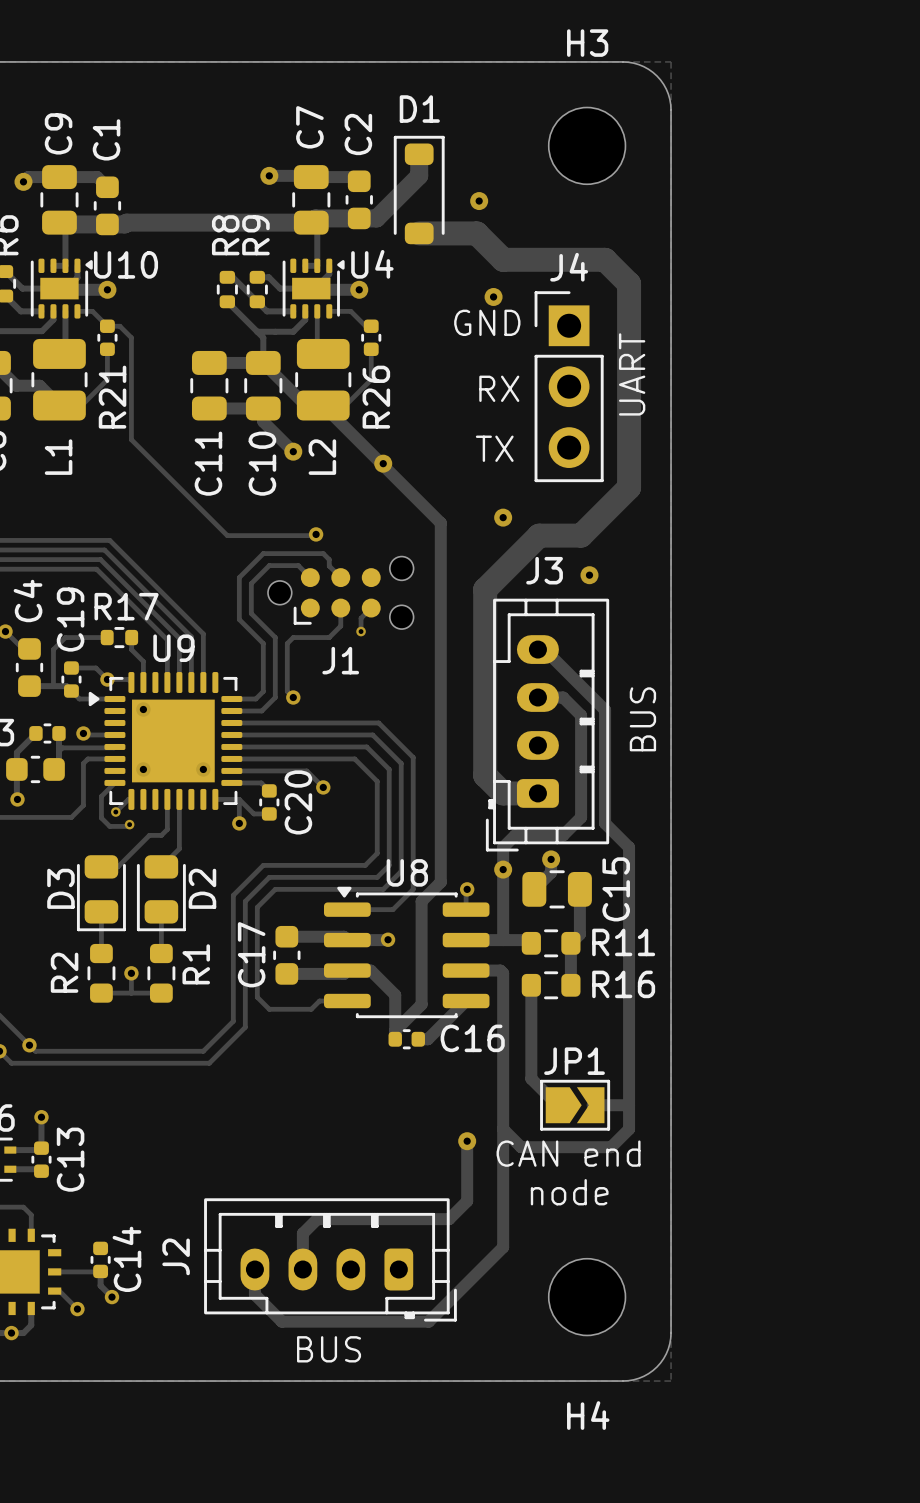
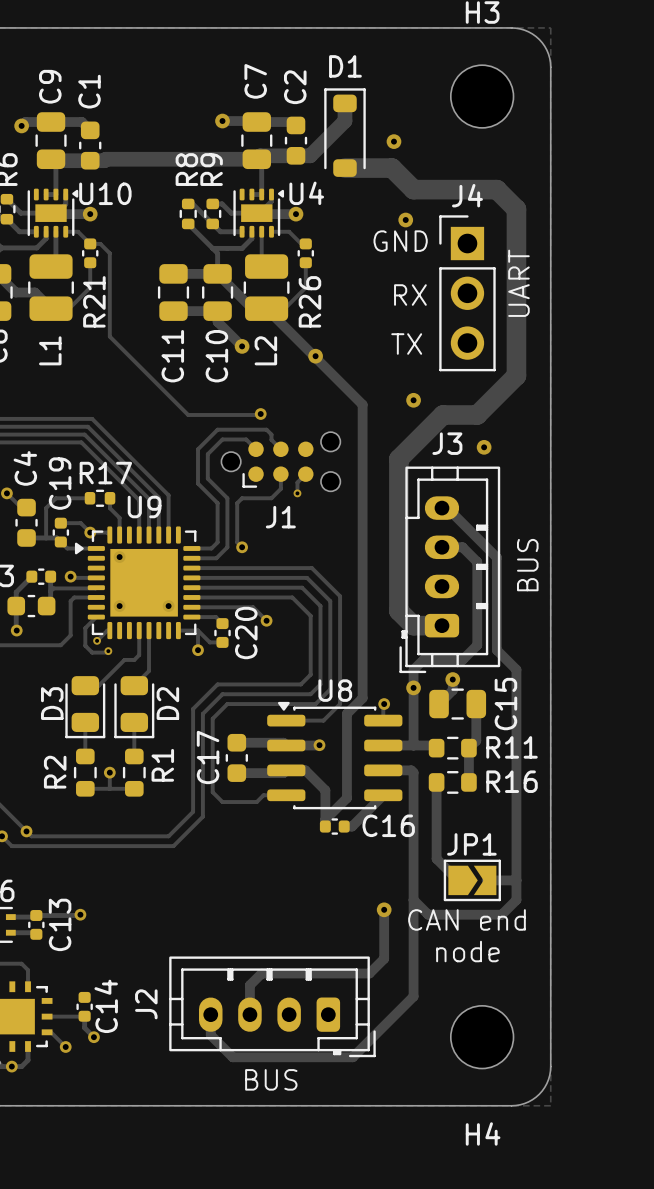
via position: (41, 1117) -> (80, 914)
track: (41, 1123) (41, 1148) -> (80, 914) (36, 915)

